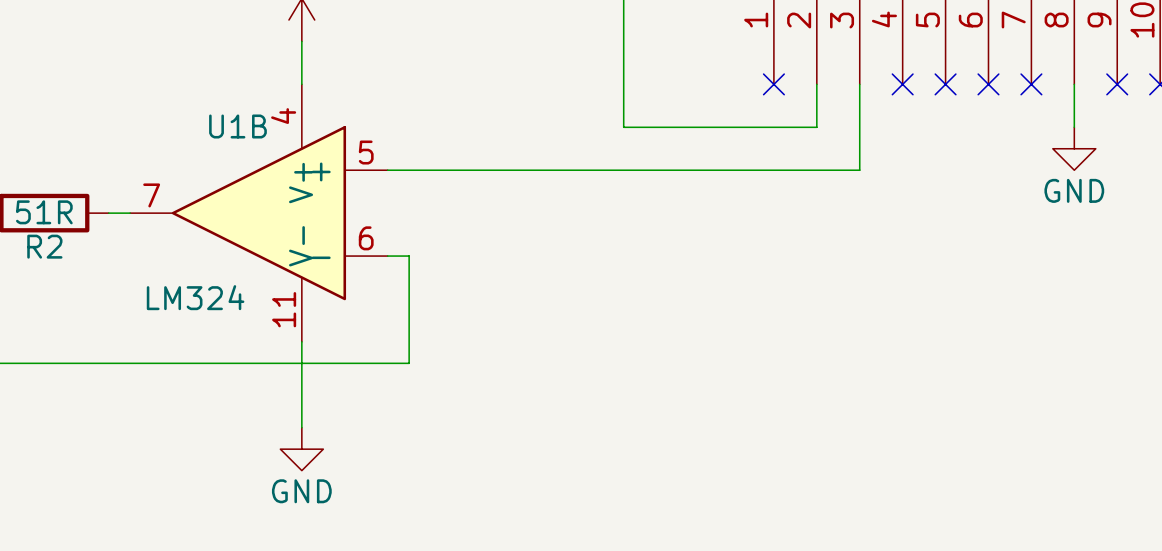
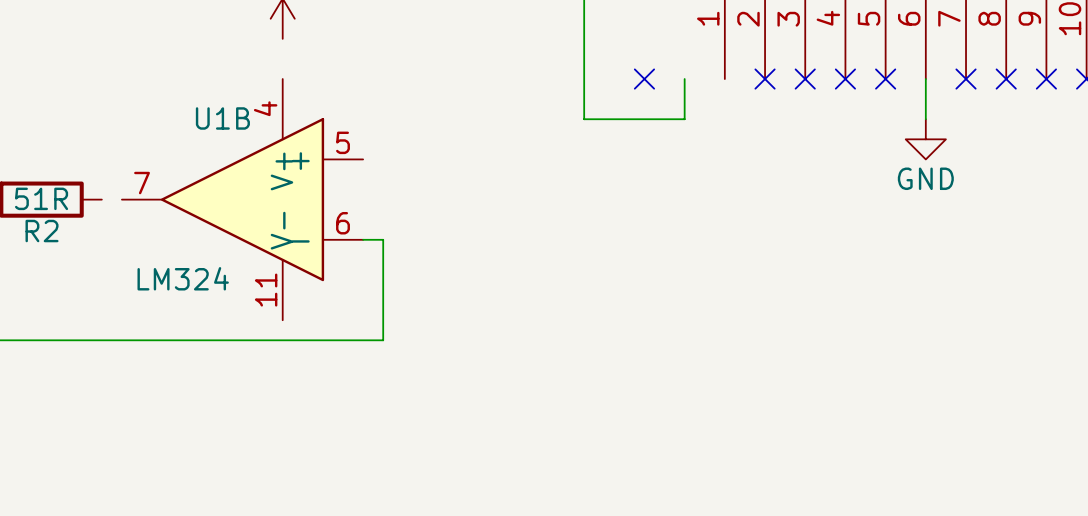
wire: (301, 41) (301, 84) -> none
no-connect mark: none -> (644, 79)
no-connect mark: (773, 84) -> none
wire: (816, 84) (816, 127) (731, 127) -> (684, 79) (684, 119)
no-connect mark: none -> (765, 79)
wire: (859, 84) (859, 170) (387, 170) -> none
no-connect mark: none -> (805, 79)
no-connect mark: (988, 84) -> none
wire: (1074, 84) (1074, 127) -> (925, 79) (925, 119)
no-connect mark: none -> (1006, 79)
power symbol position: GND (1074, 148) -> GND (925, 139)
wire: (108, 213) (130, 213) -> none
wire: (301, 341) (301, 427) -> none
power symbol: GND (301, 449) -> none

